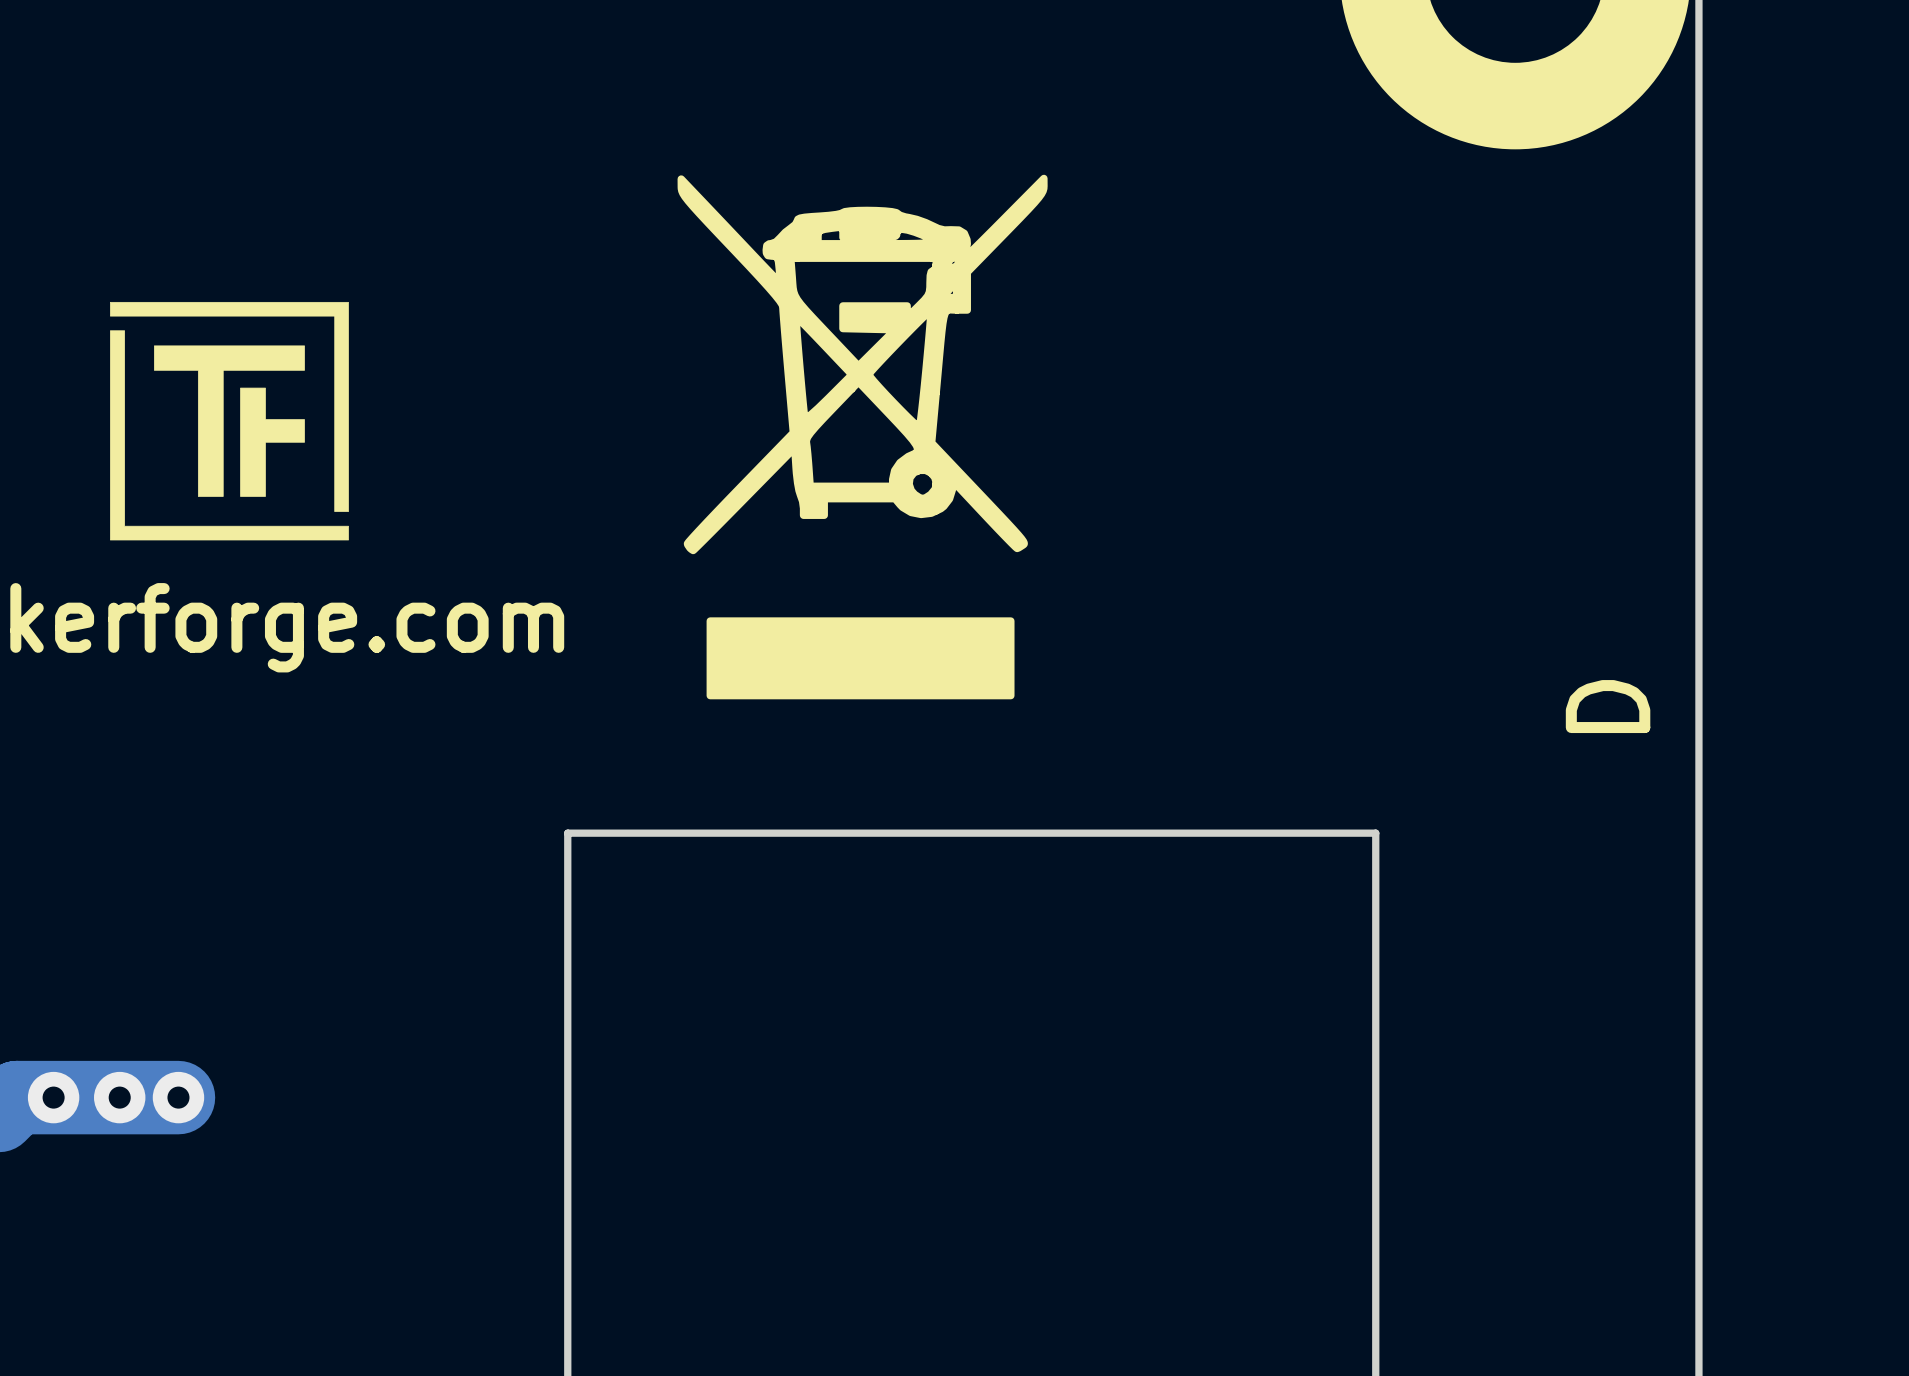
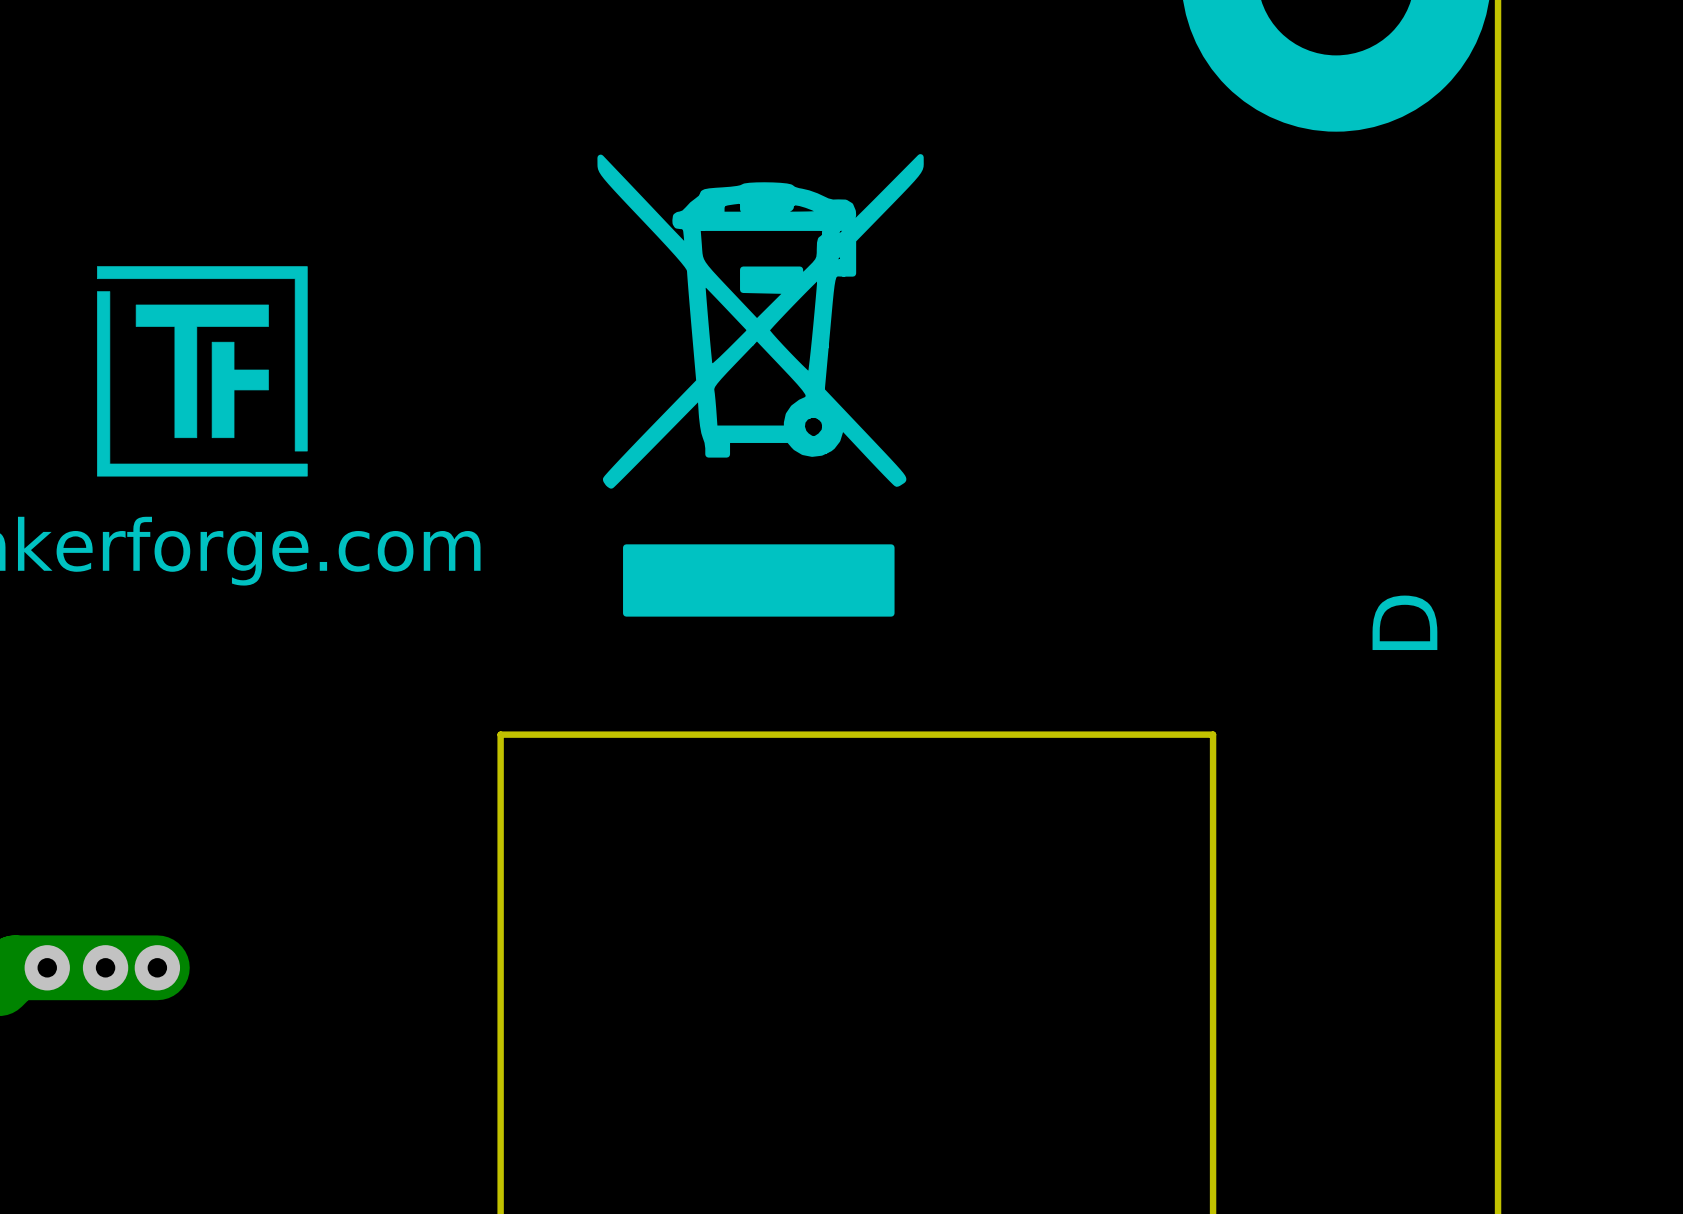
text position: D (1608, 706) -> D (1404, 622)

